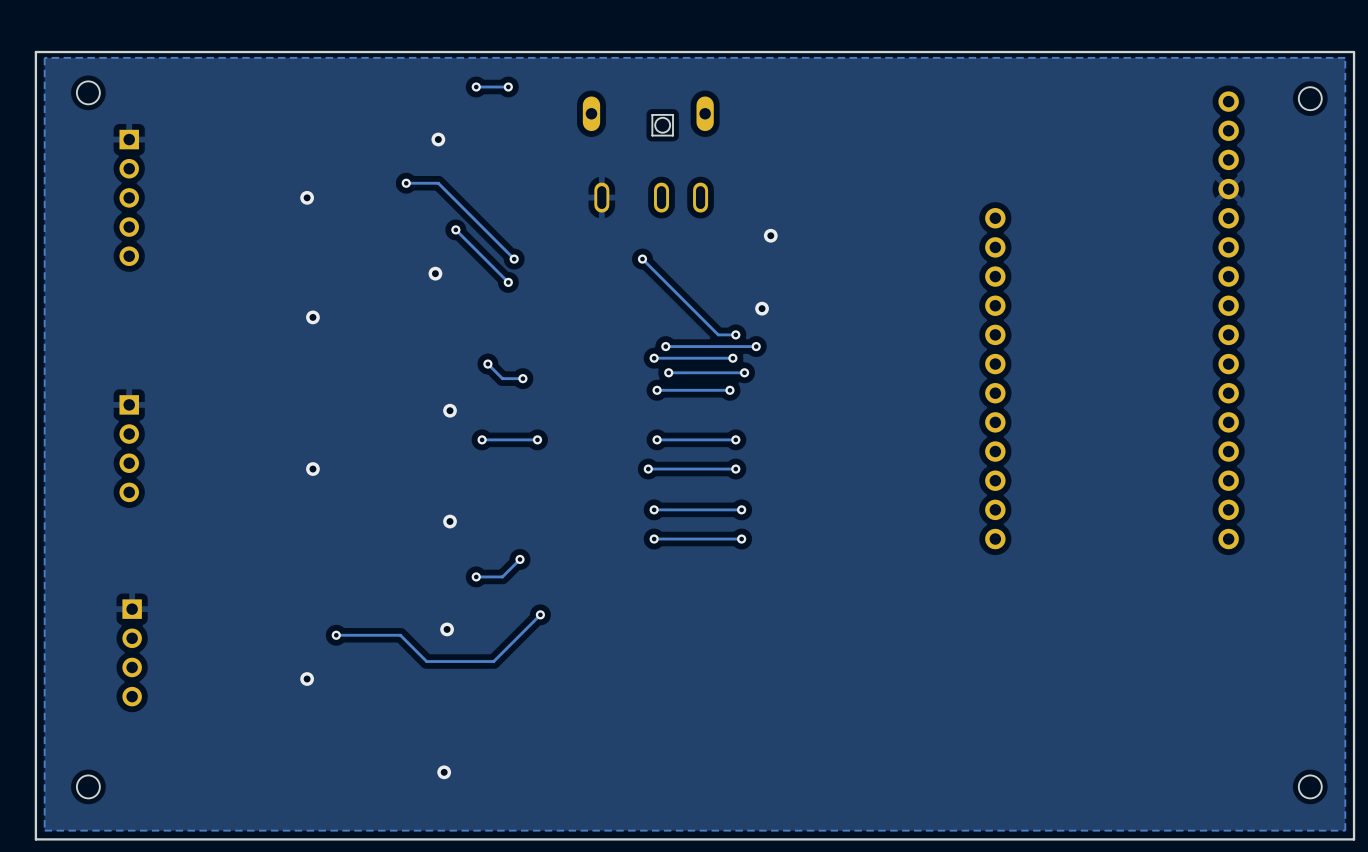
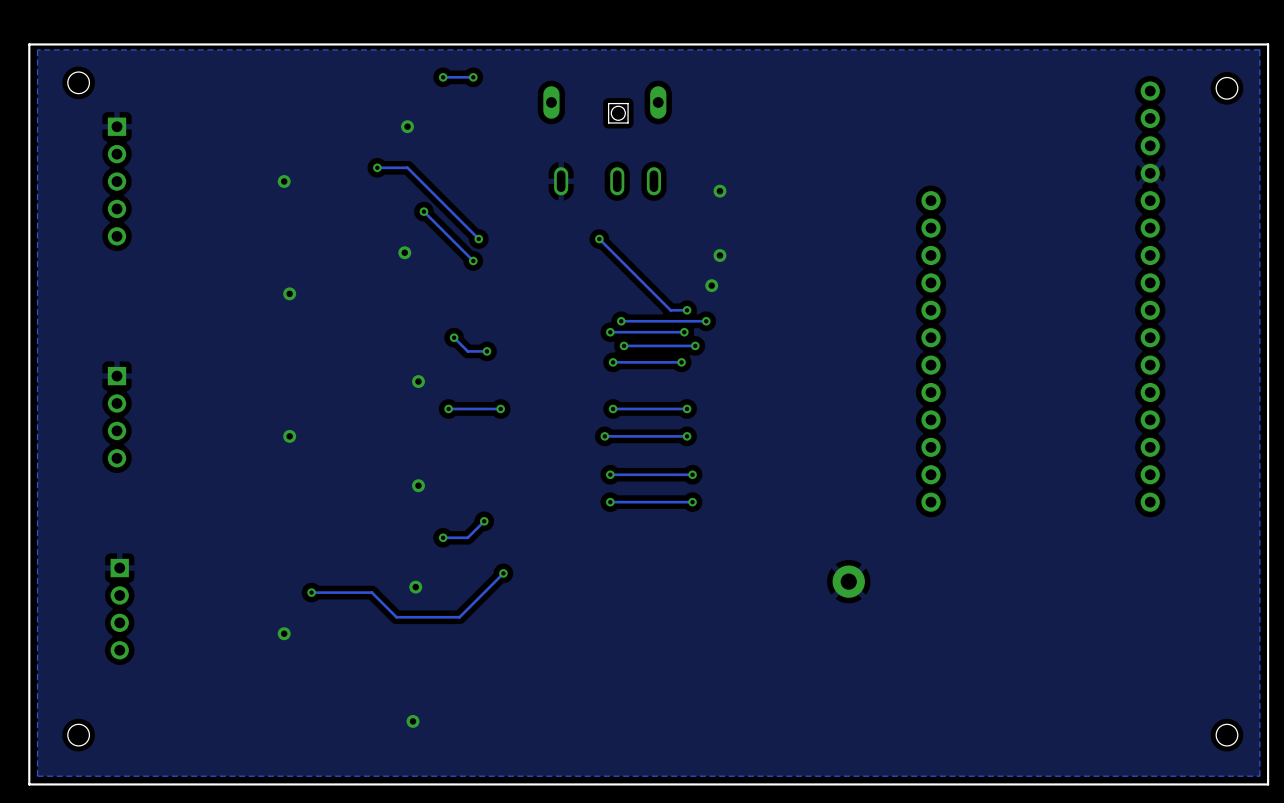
via: none -> (719, 191)
via: (770, 235) -> none
via: none -> (719, 255)
part: none -> (848, 581)

